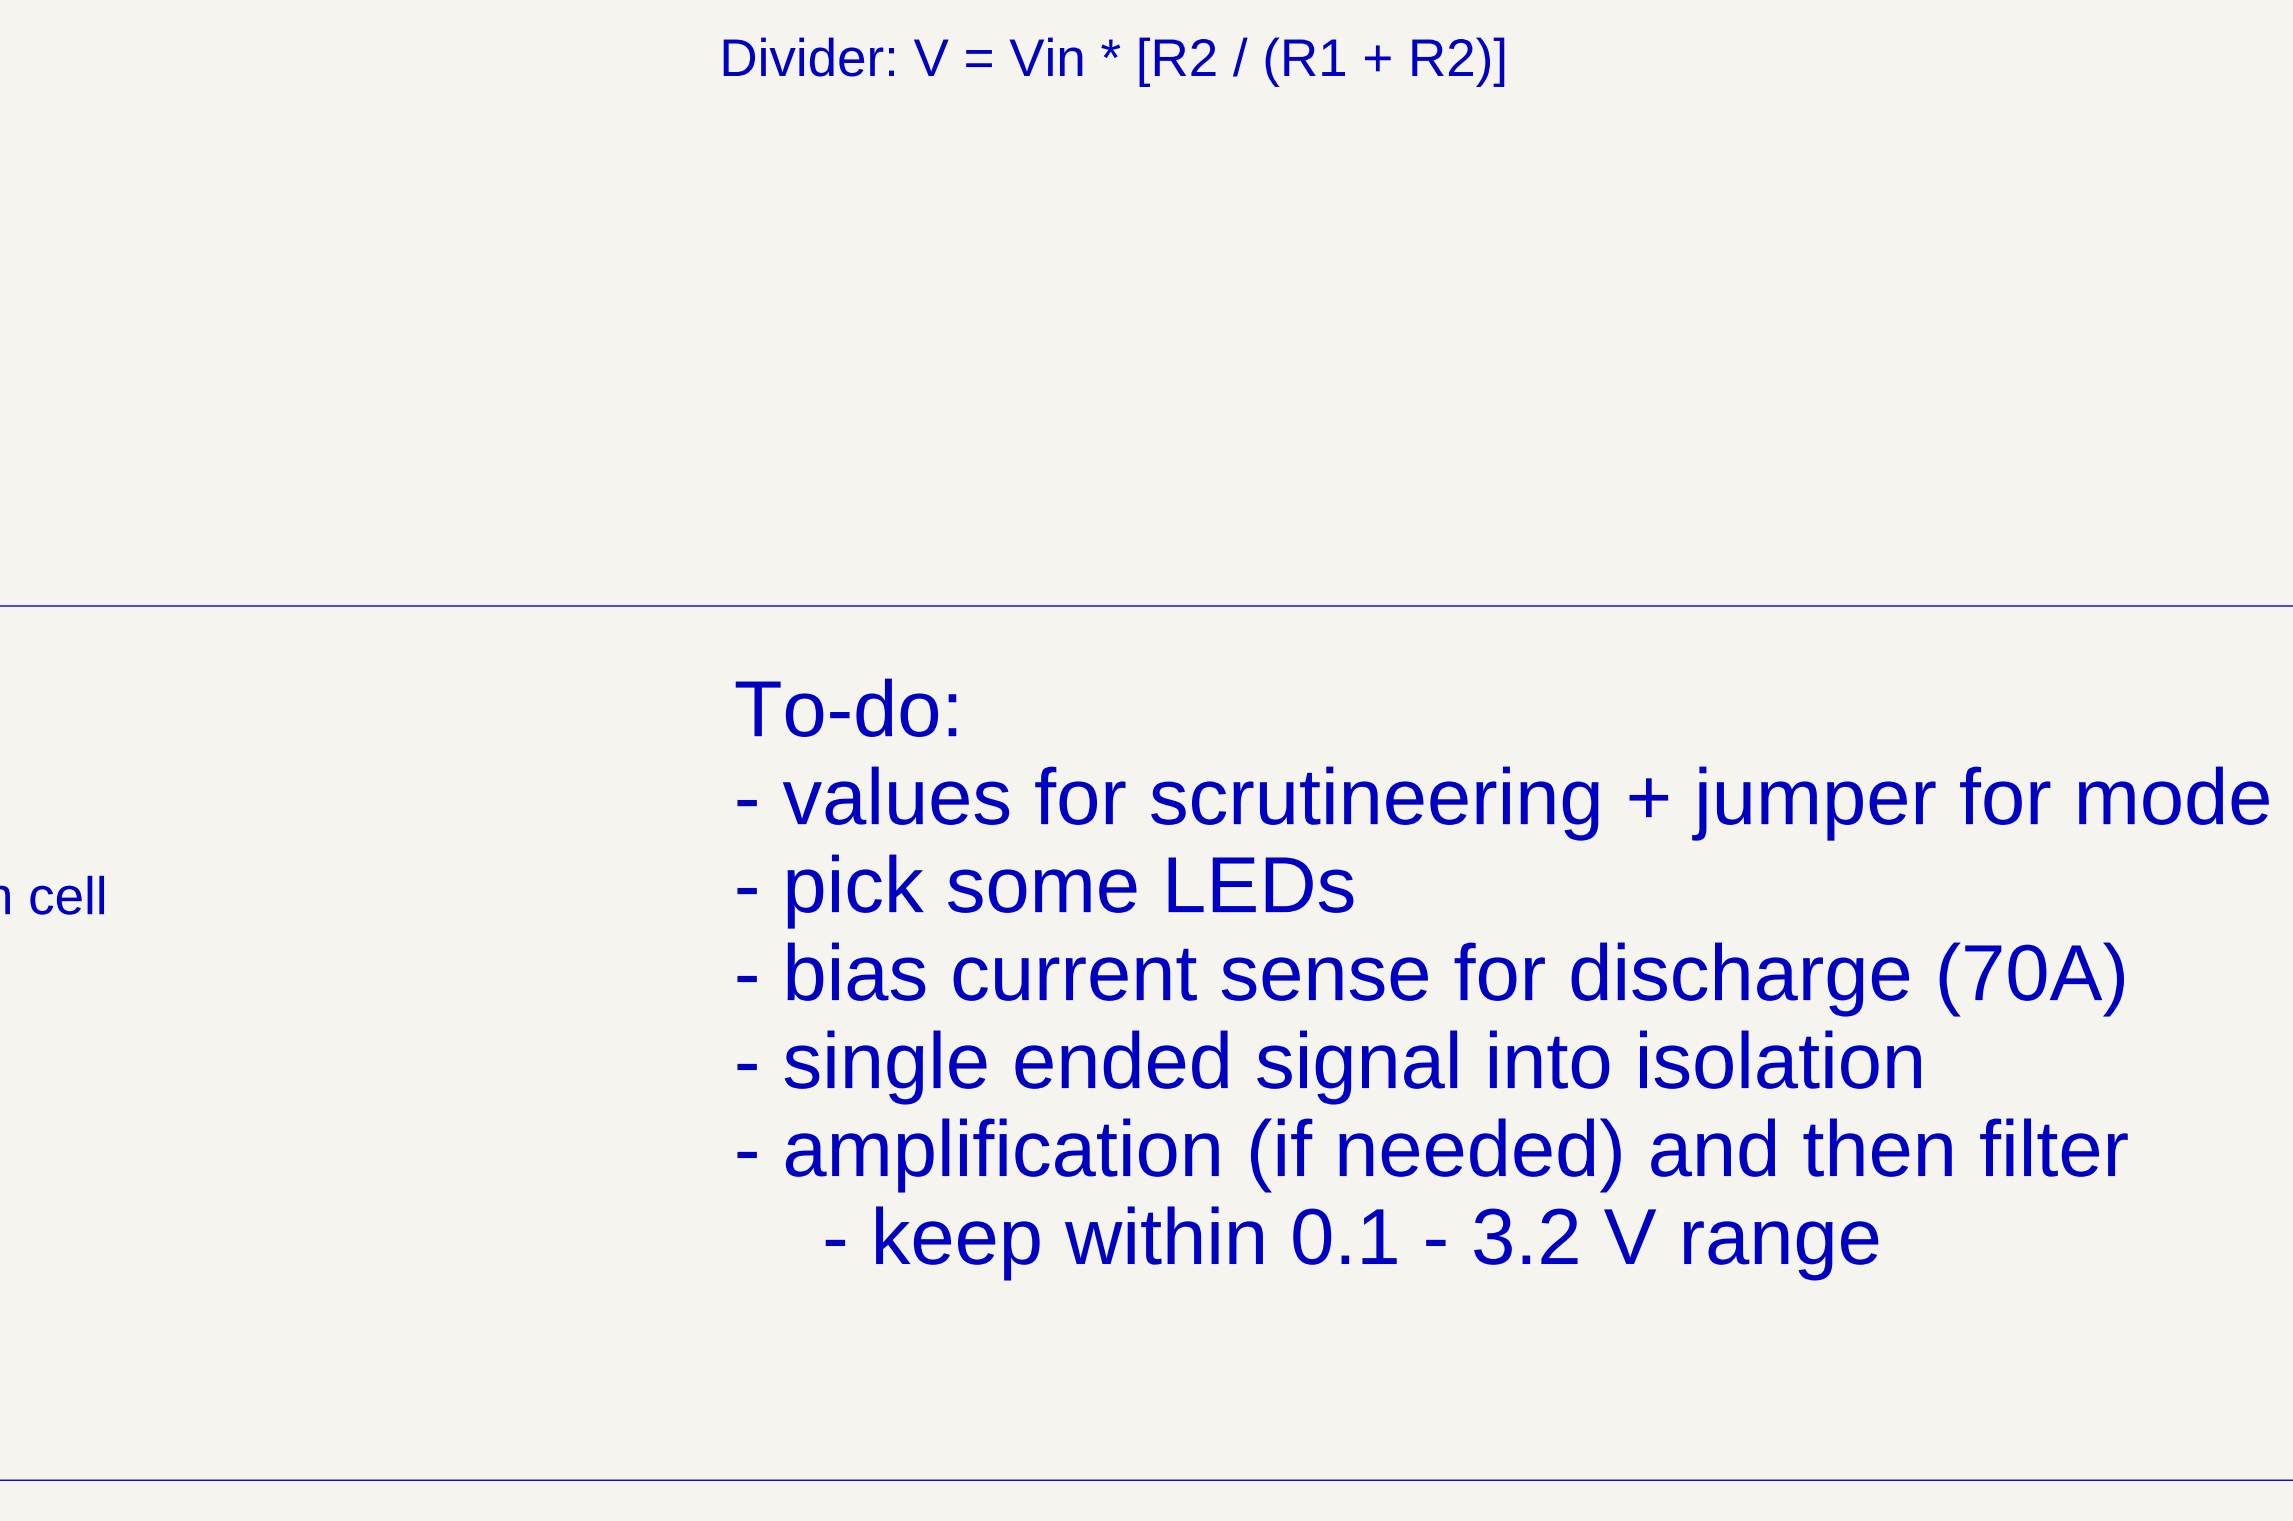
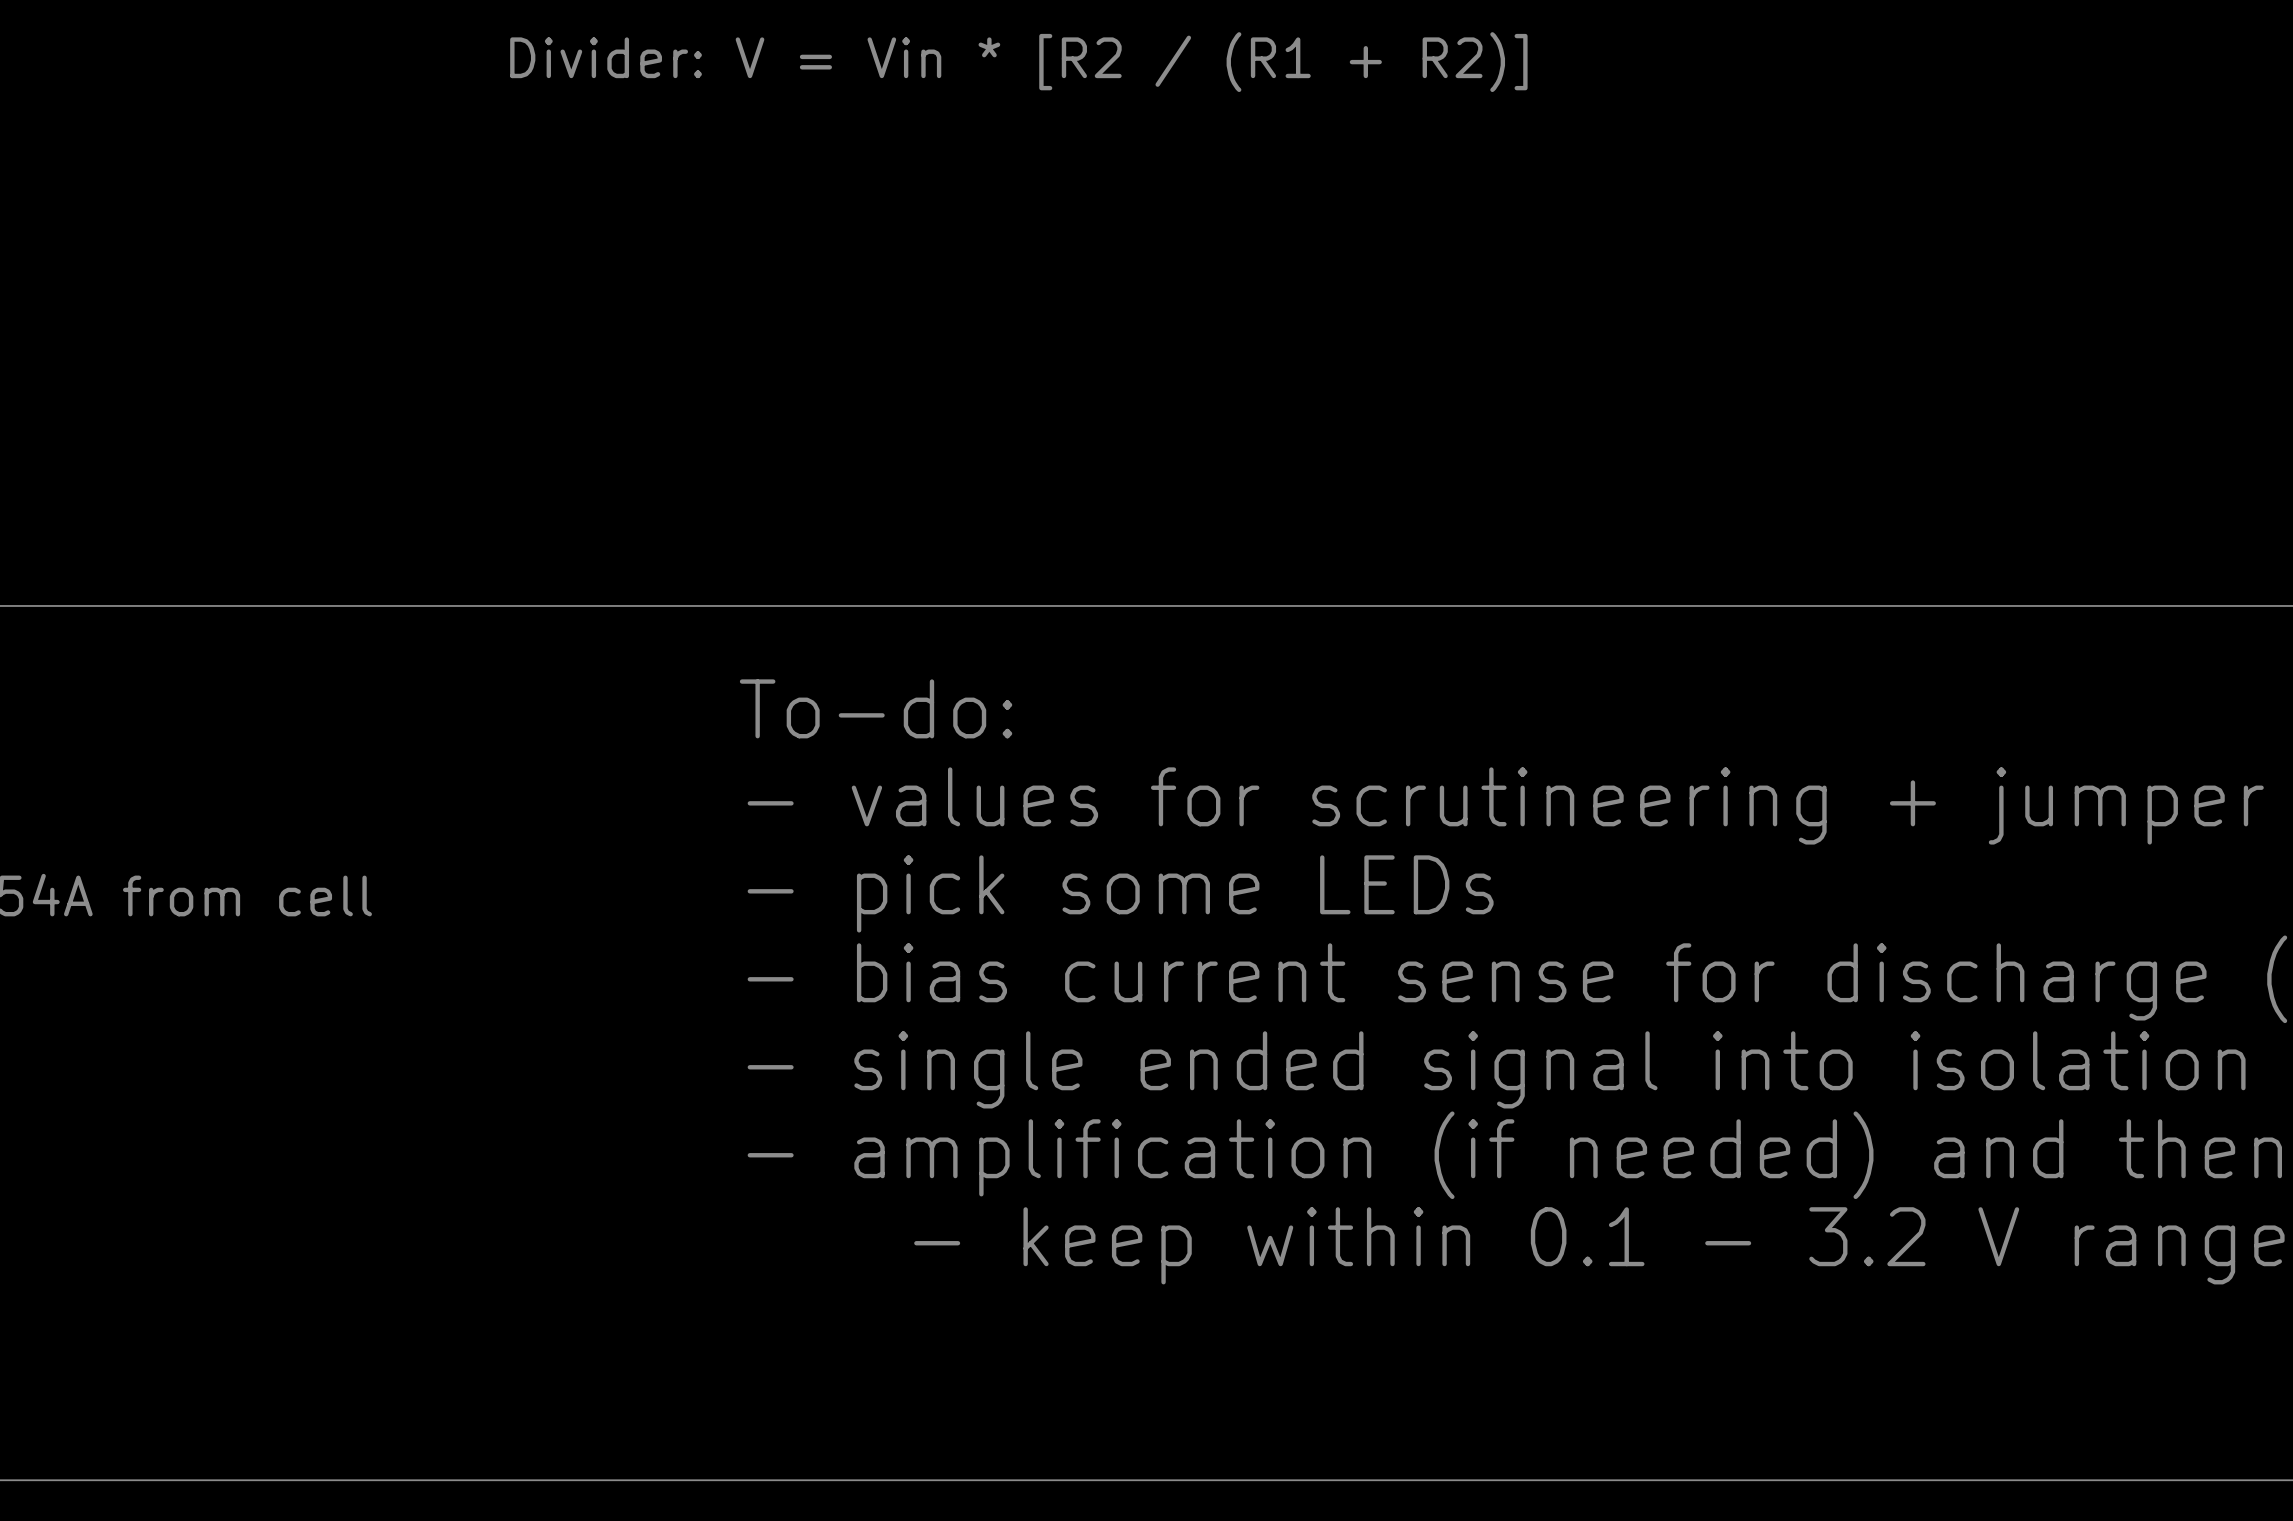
text position: Divider: V = Vin * [R2 / (R1 + R2)] (1113, 62) -> Divider: V = Vin * [R2 / (R1 + R2)] (1018, 62)

